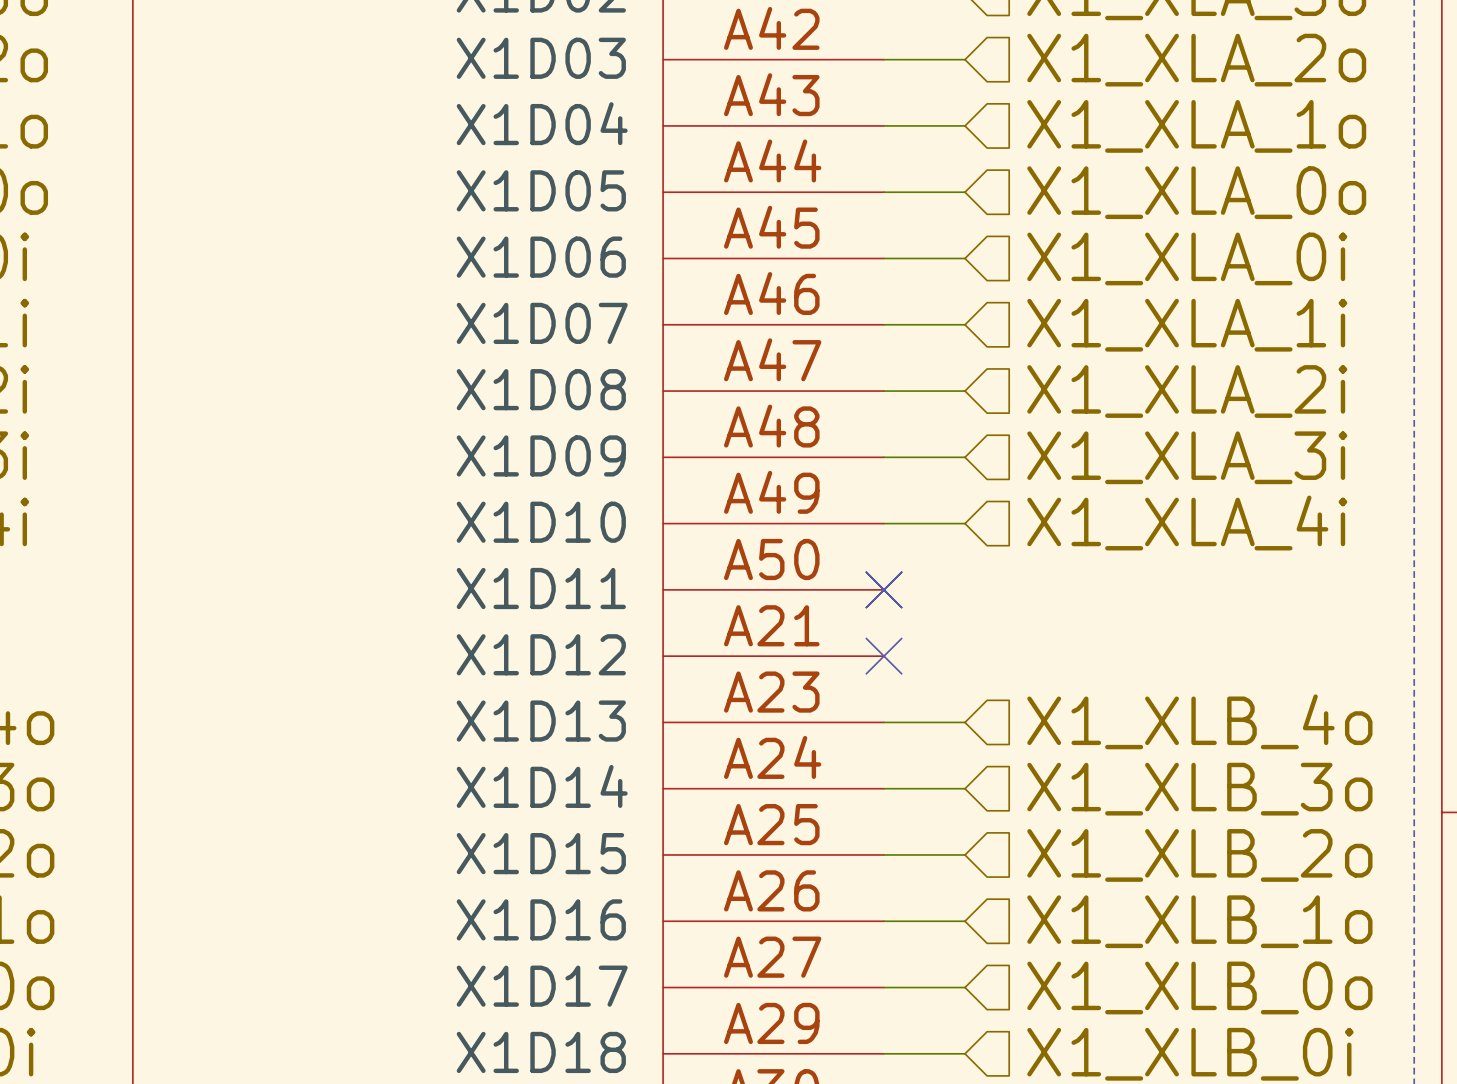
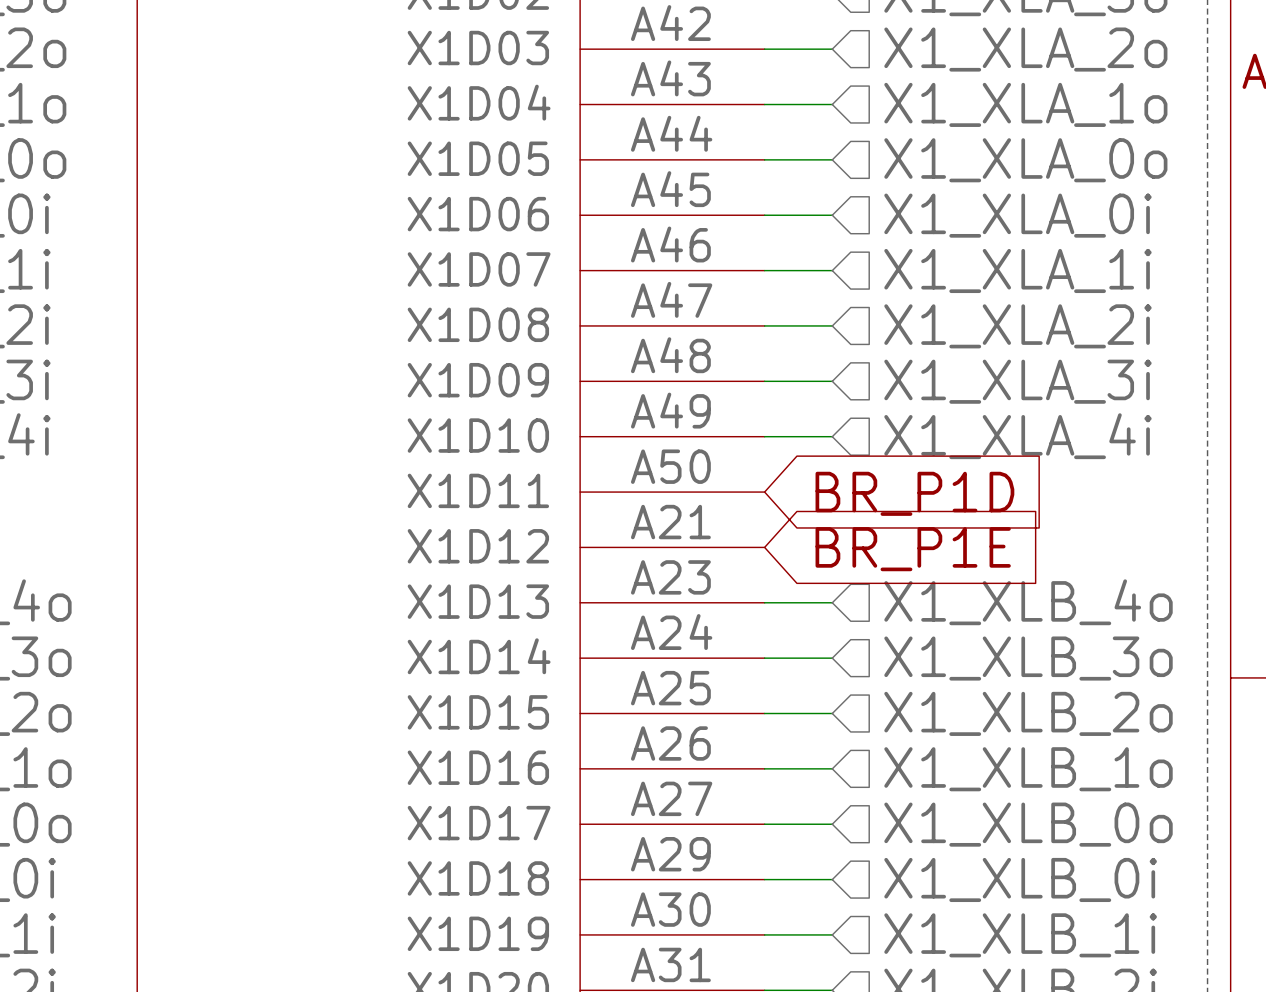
no-connect mark: (884, 589) -> none
global label: none -> BR_P1D (914, 493)
no-connect mark: (884, 656) -> none
global label: none -> BR_P1E (913, 549)

